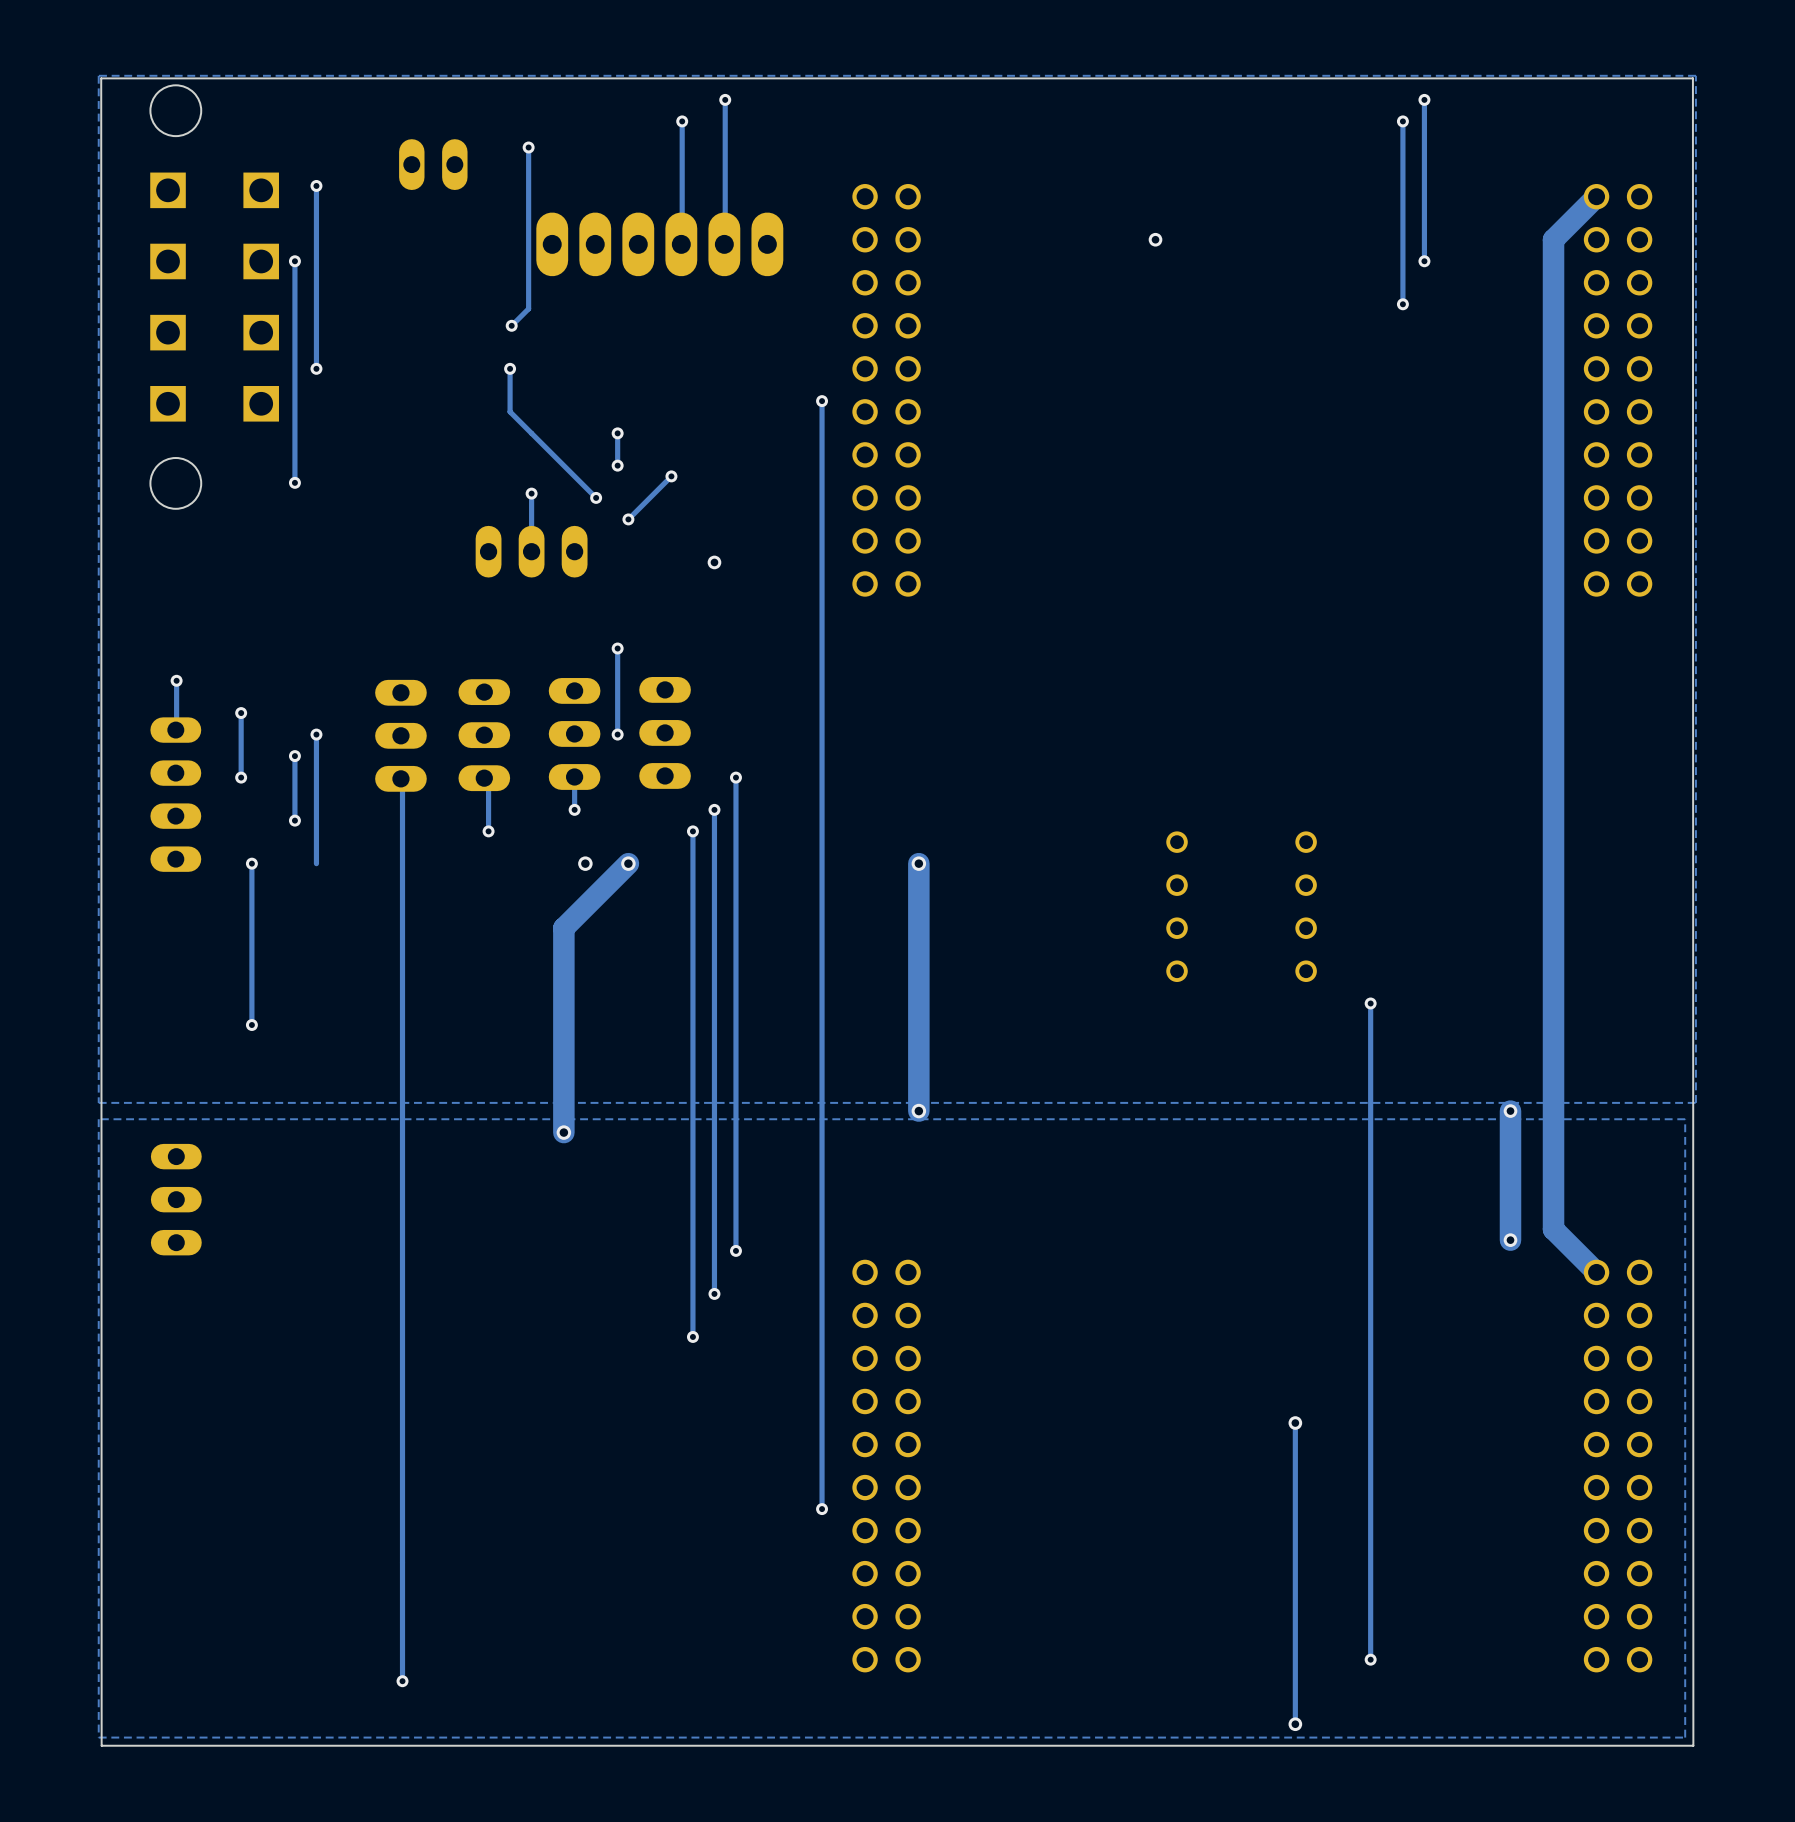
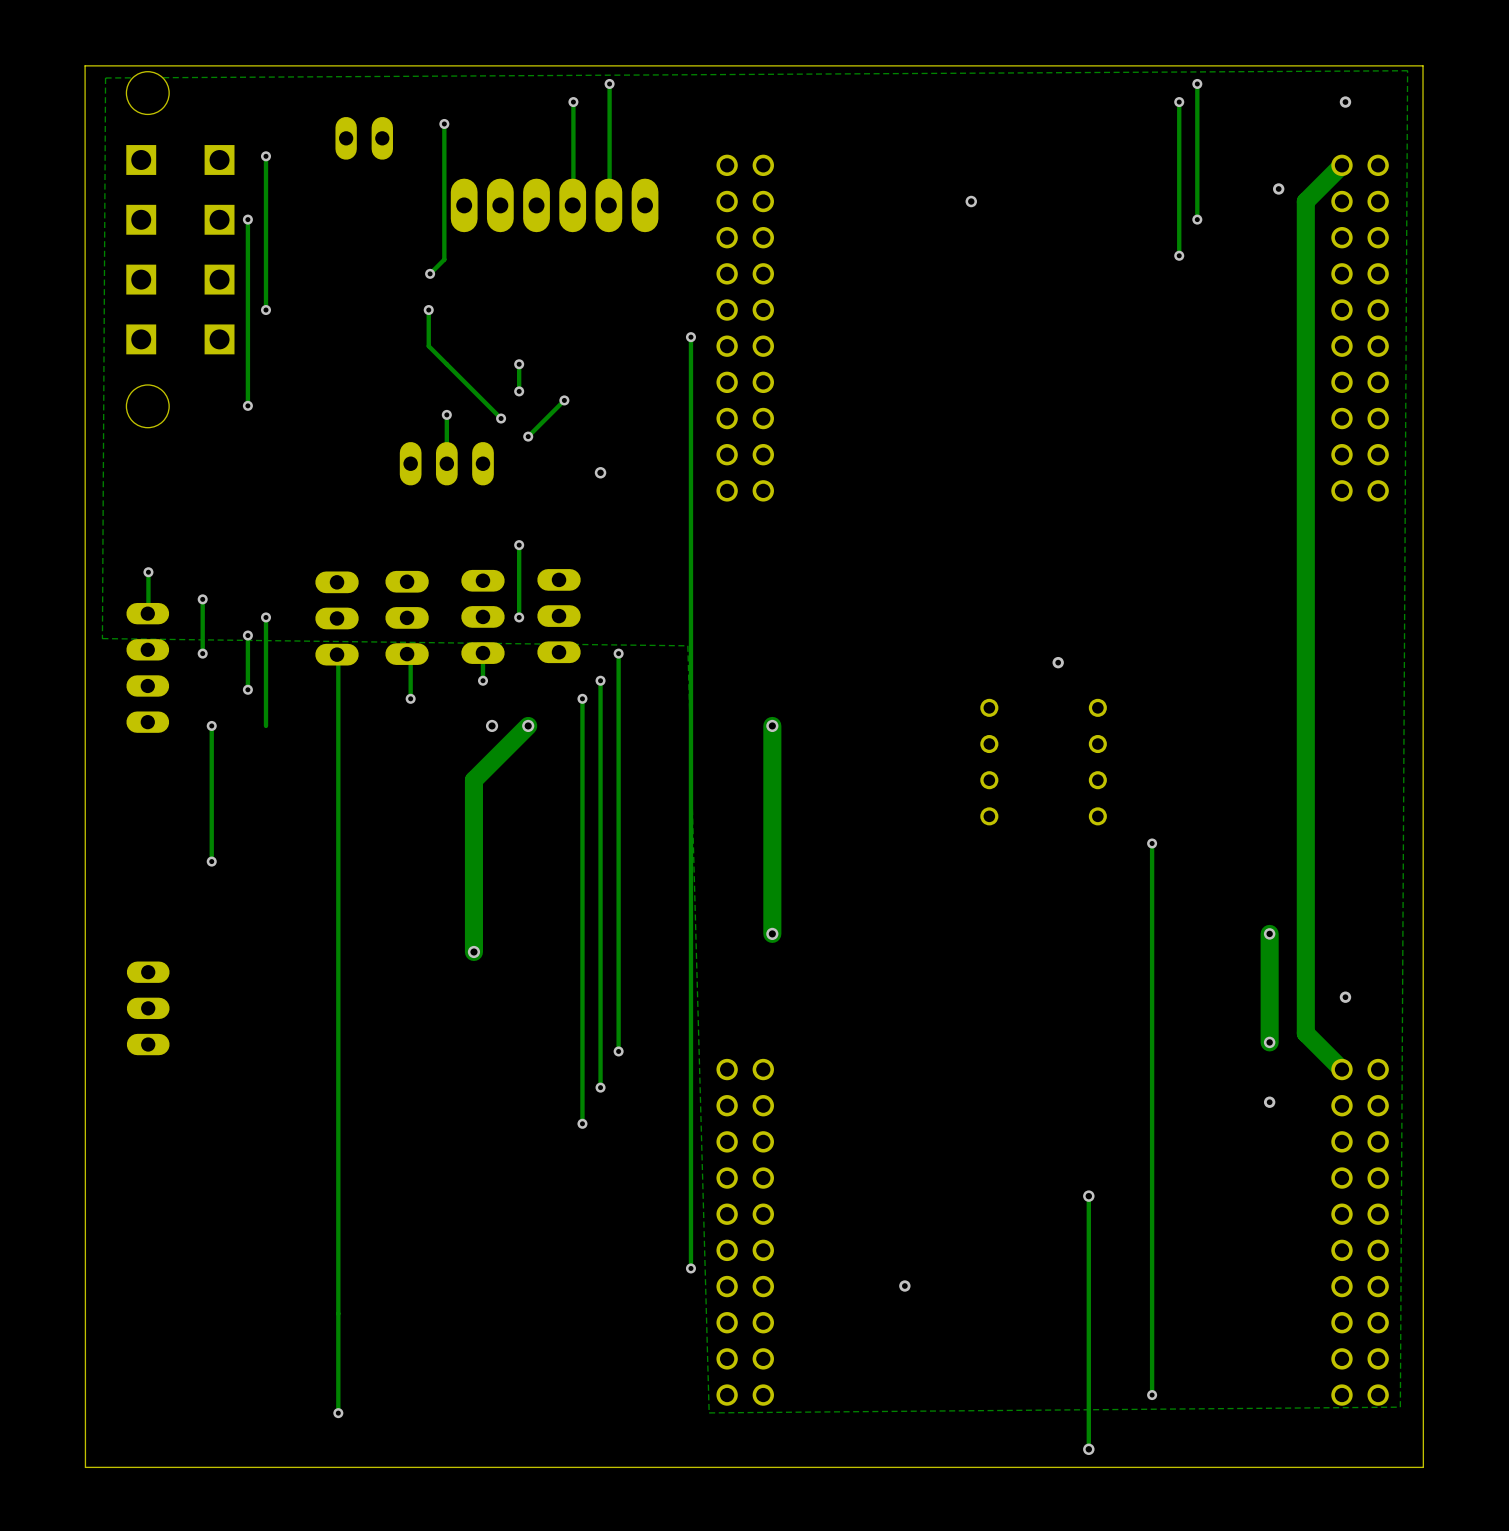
zone outline: (1695, 75) (1695, 1102) (98, 1102) (98, 75) (1695, 75) -> (1407, 70) (1400, 1407) (709, 1412) (687, 645) (102, 638) (105, 78) (1407, 70)
via: none -> (1345, 102)
via: none -> (1278, 188)
via: none -> (1058, 662)
zone outline: (1685, 1119) (1685, 1737) (98, 1737) (98, 1119) (1685, 1119) -> none
via: none -> (1345, 997)
via: none -> (1269, 1102)
via: none -> (904, 1286)

